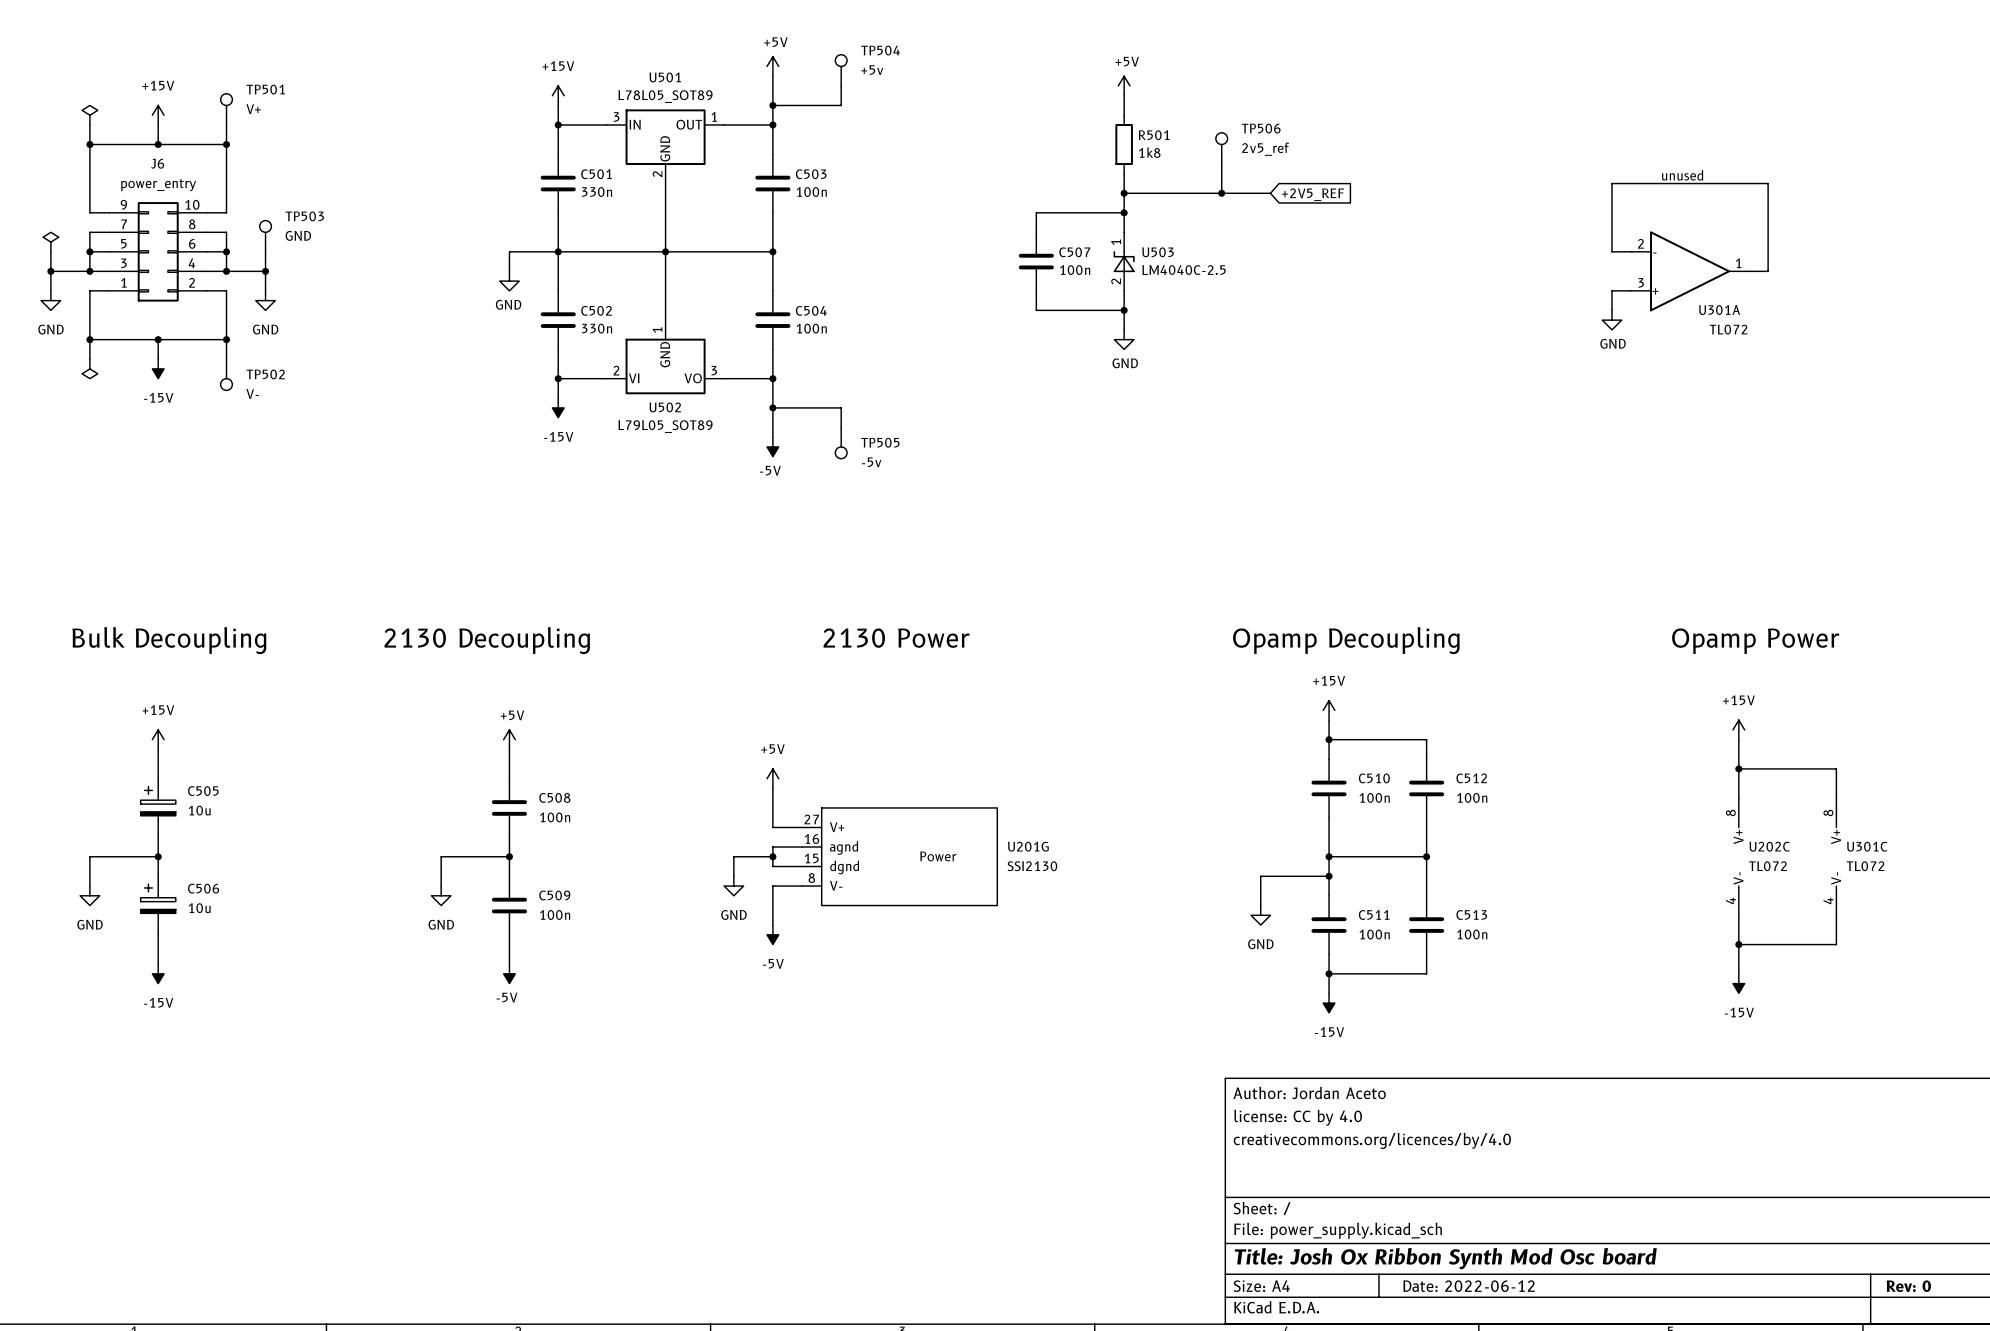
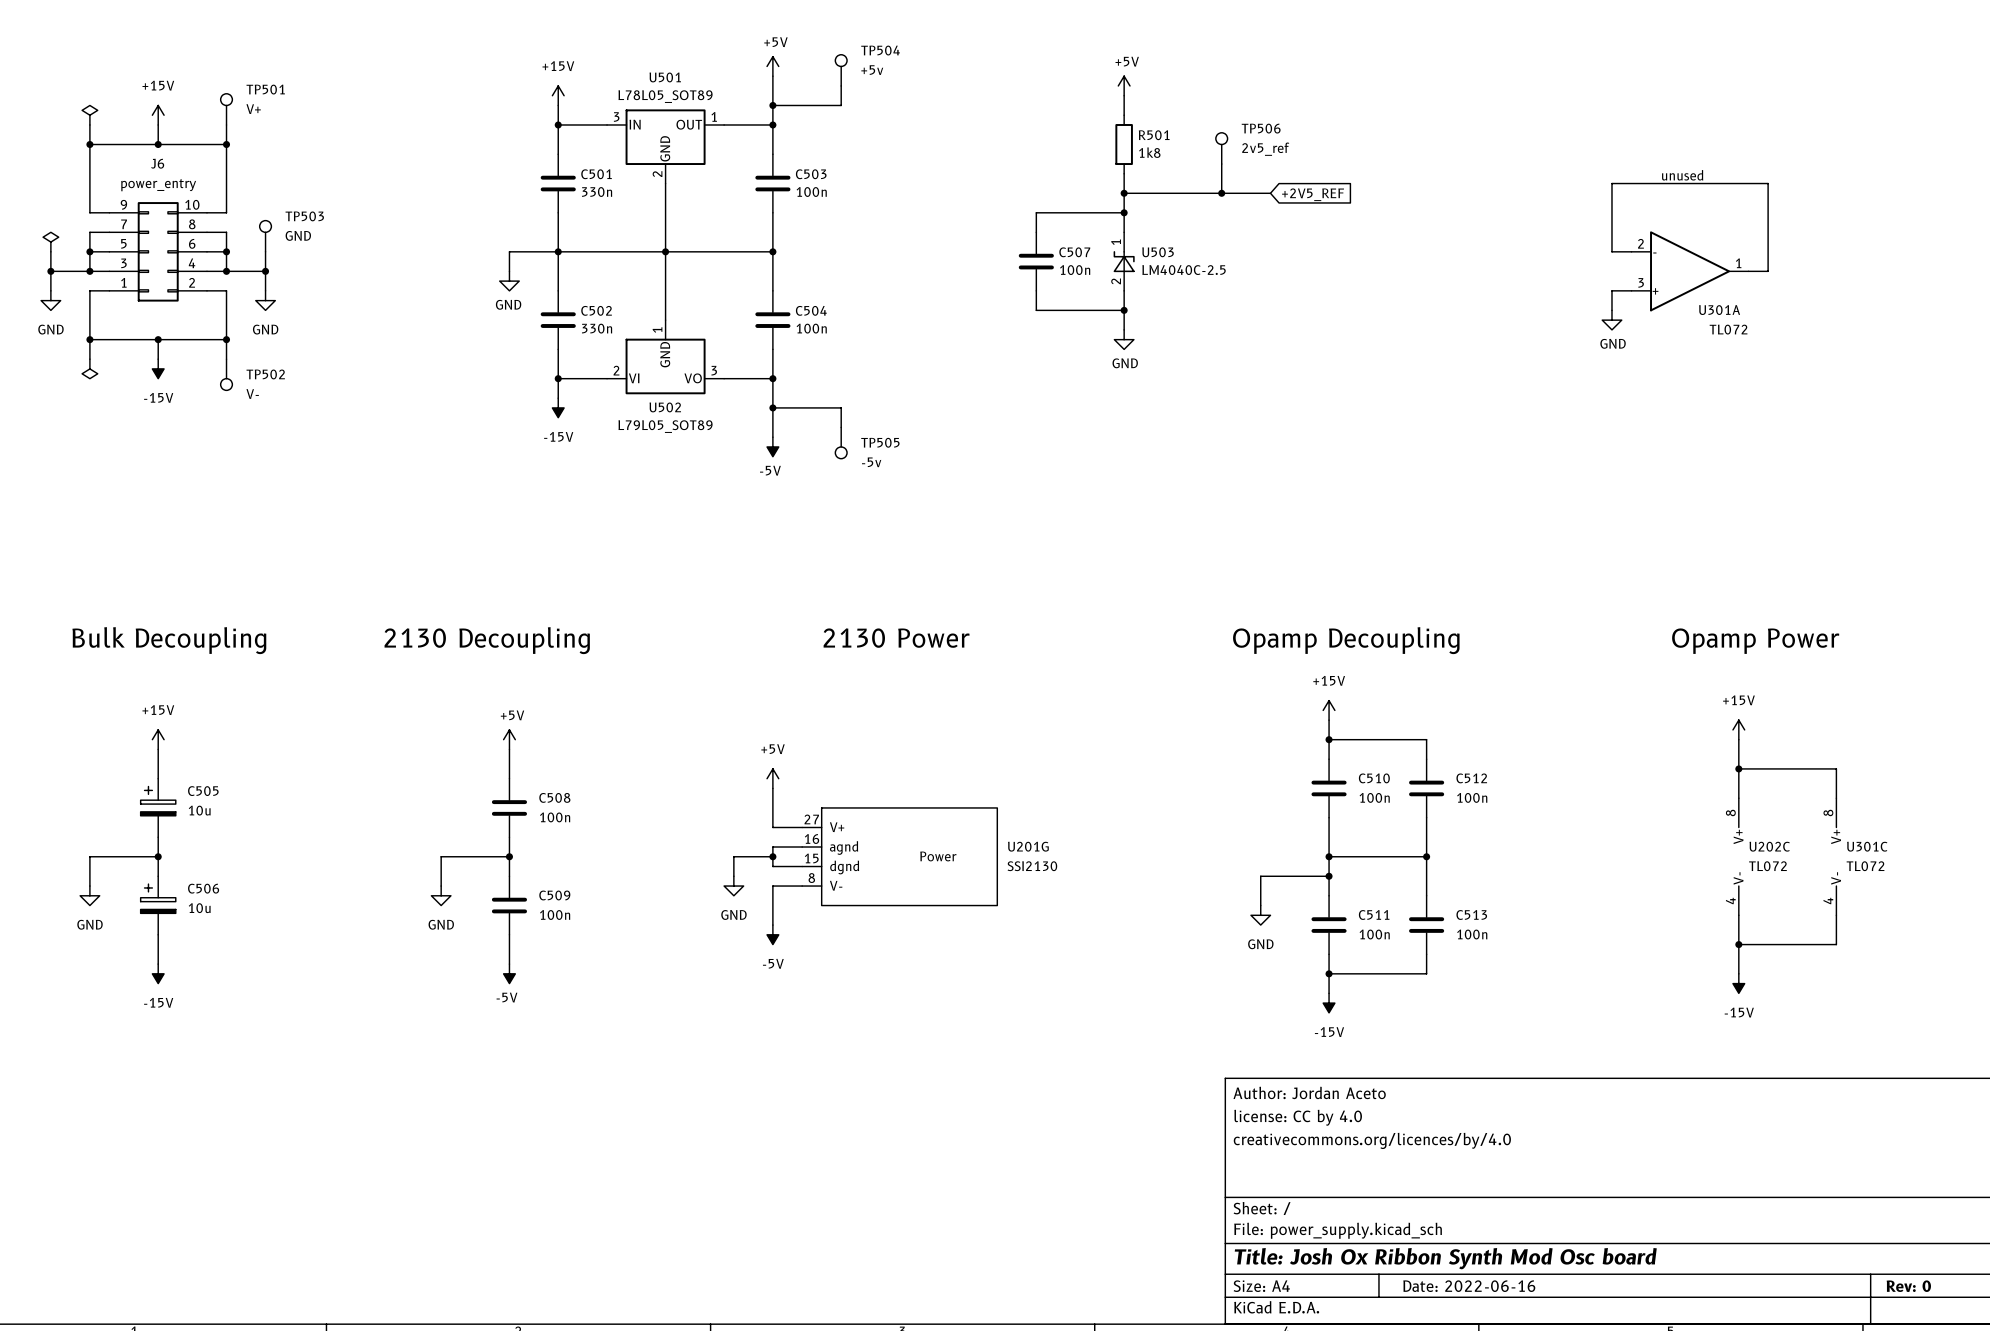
title block: Date: 2022-06-12 (1469, 1286) -> Date: 2022-06-16 (1469, 1286)

